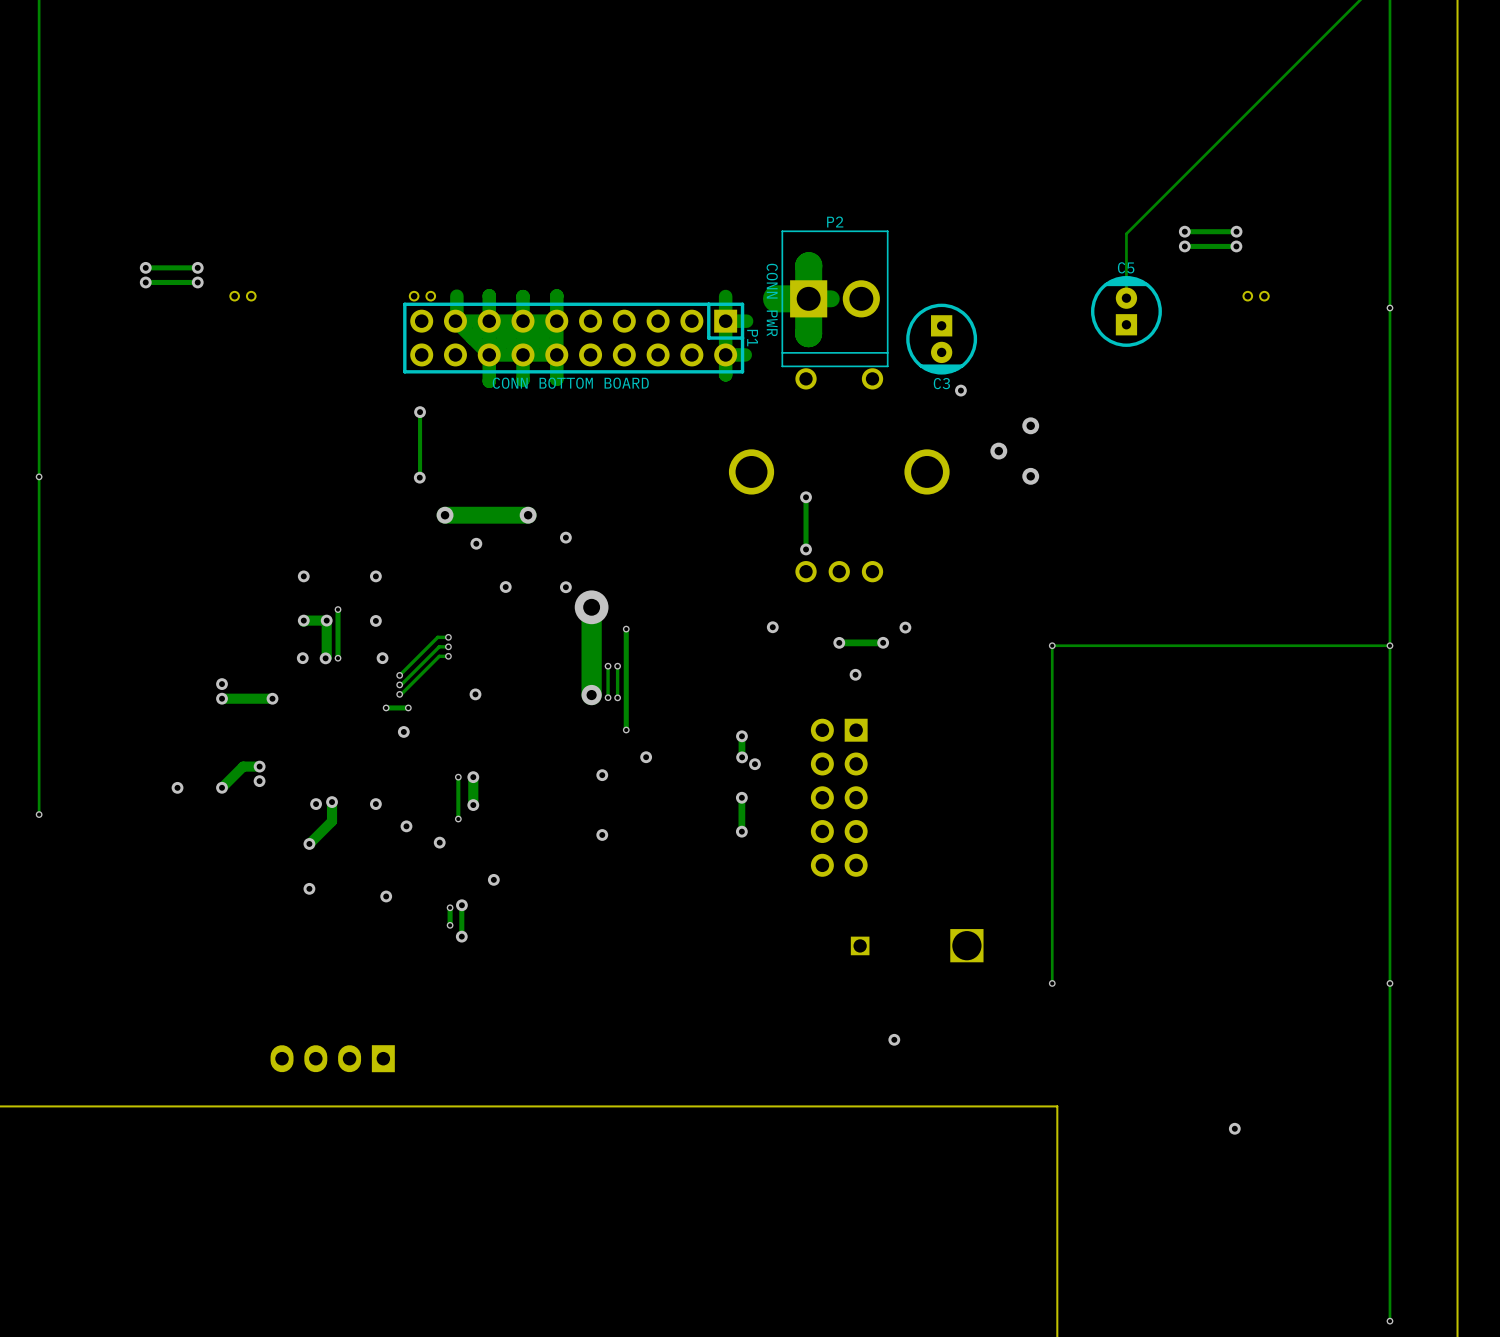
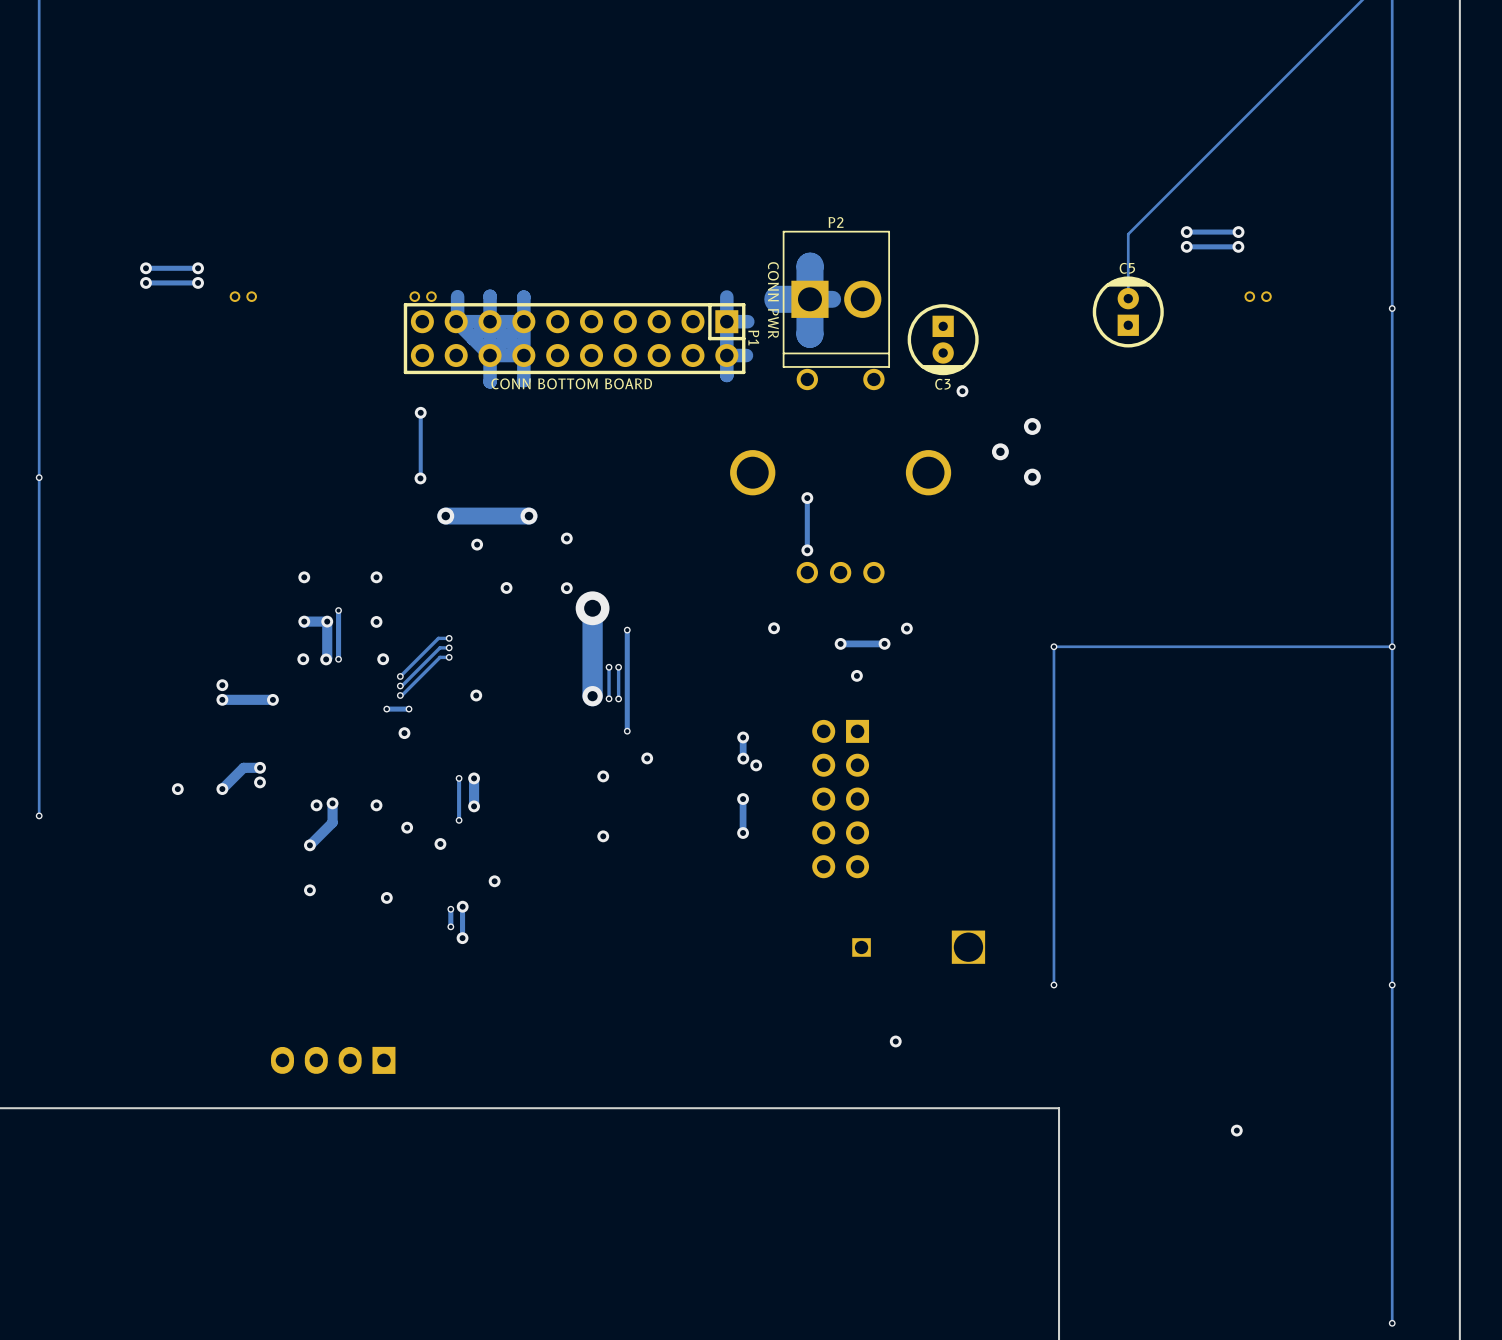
track: (556, 295) (556, 379) -> none
track: (556, 321) (523, 321) (556, 354) (523, 354) (556, 321) -> none

